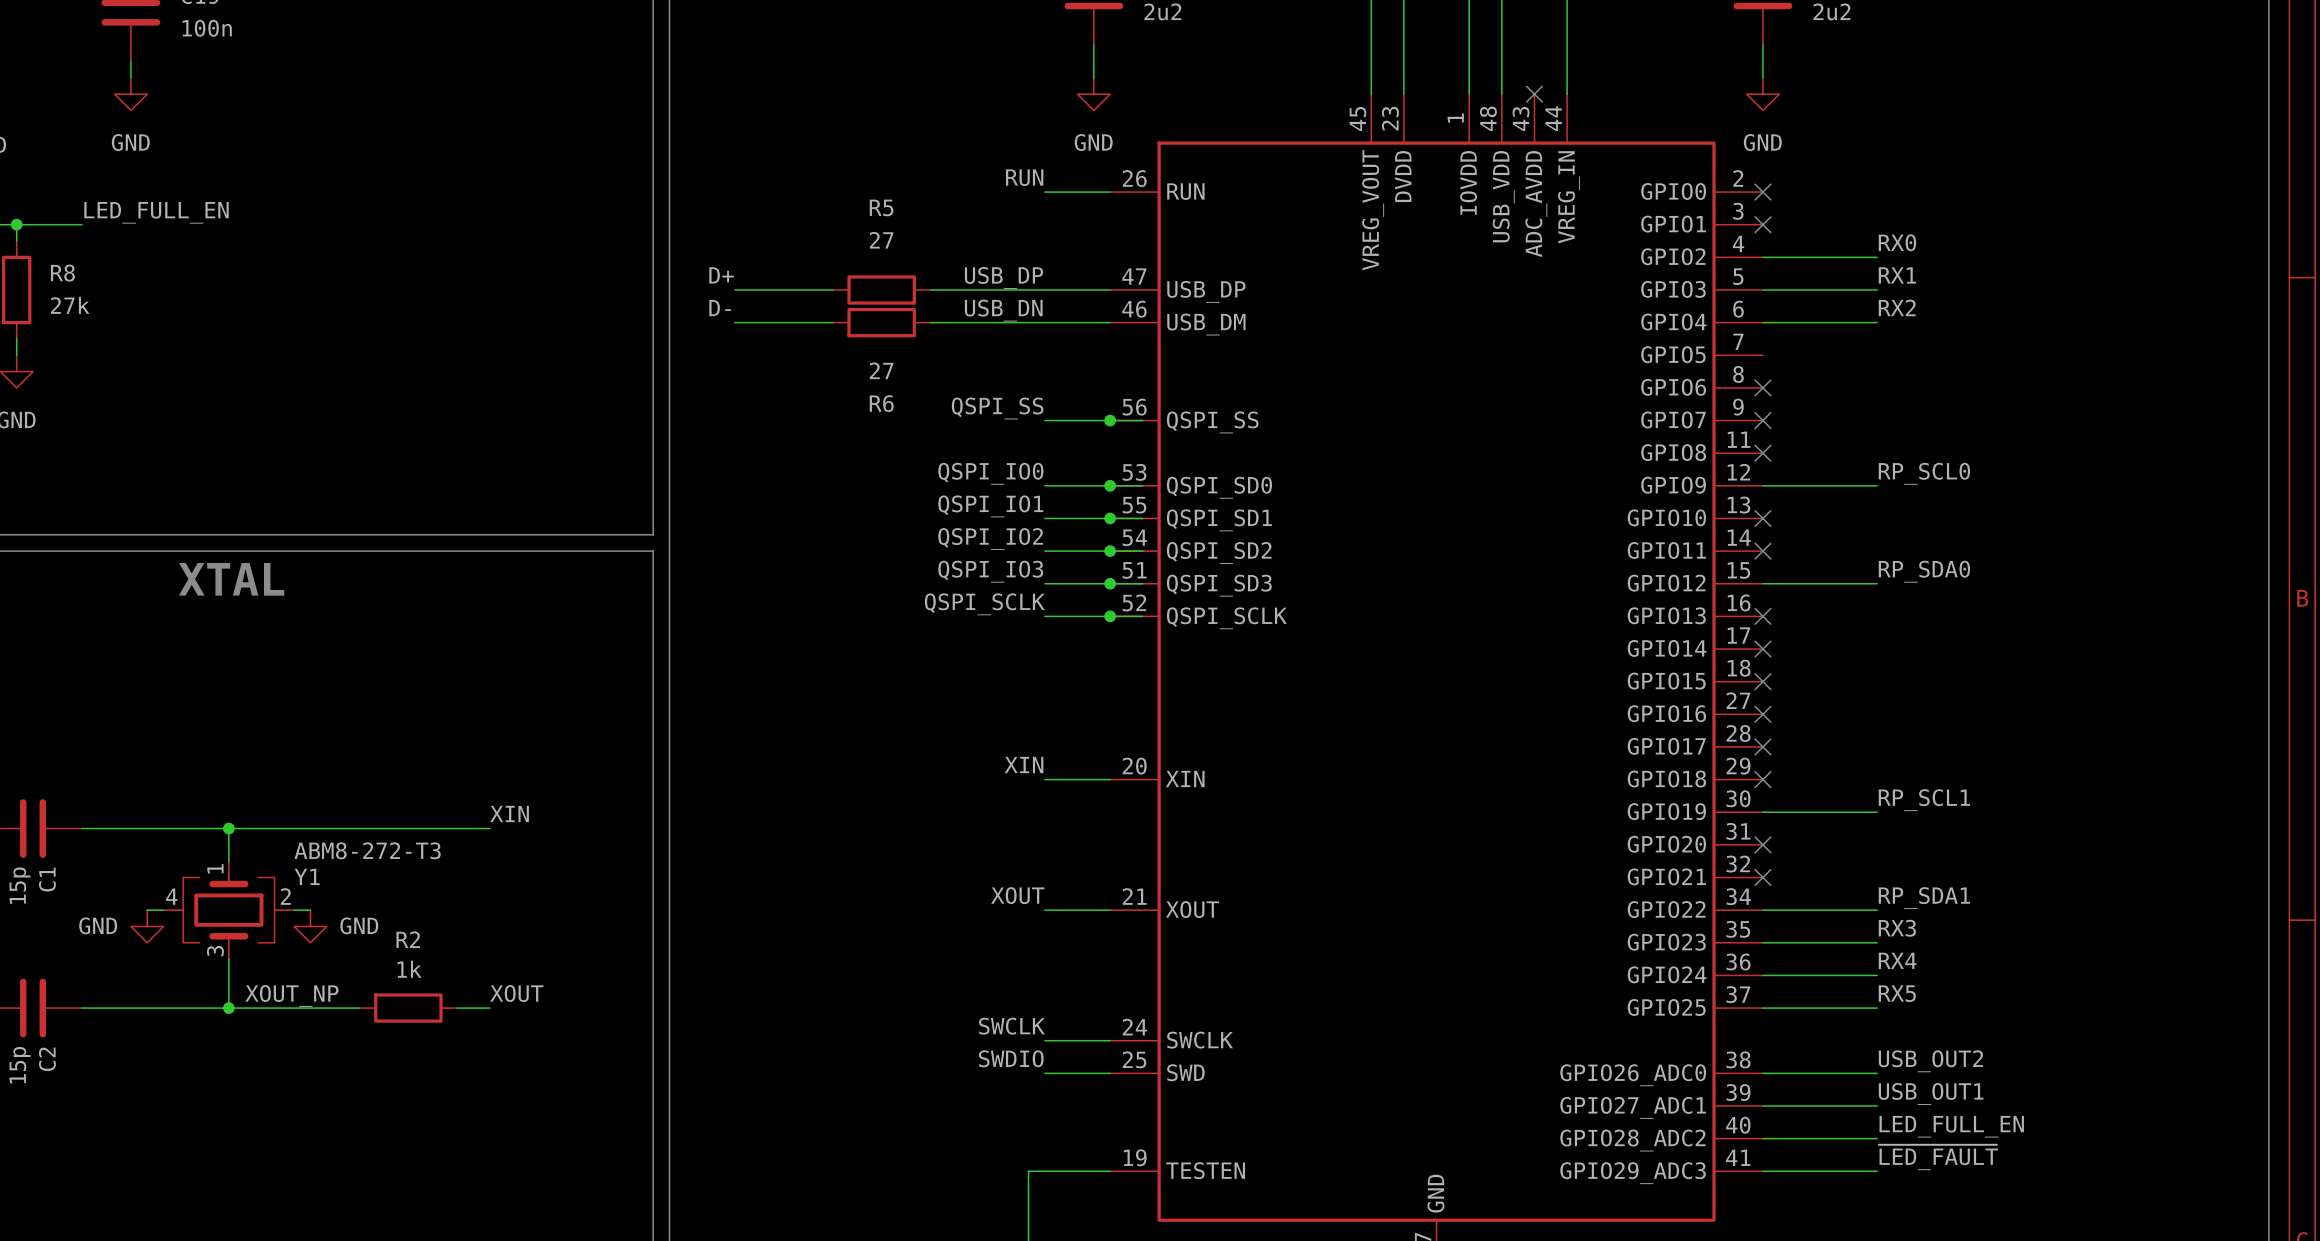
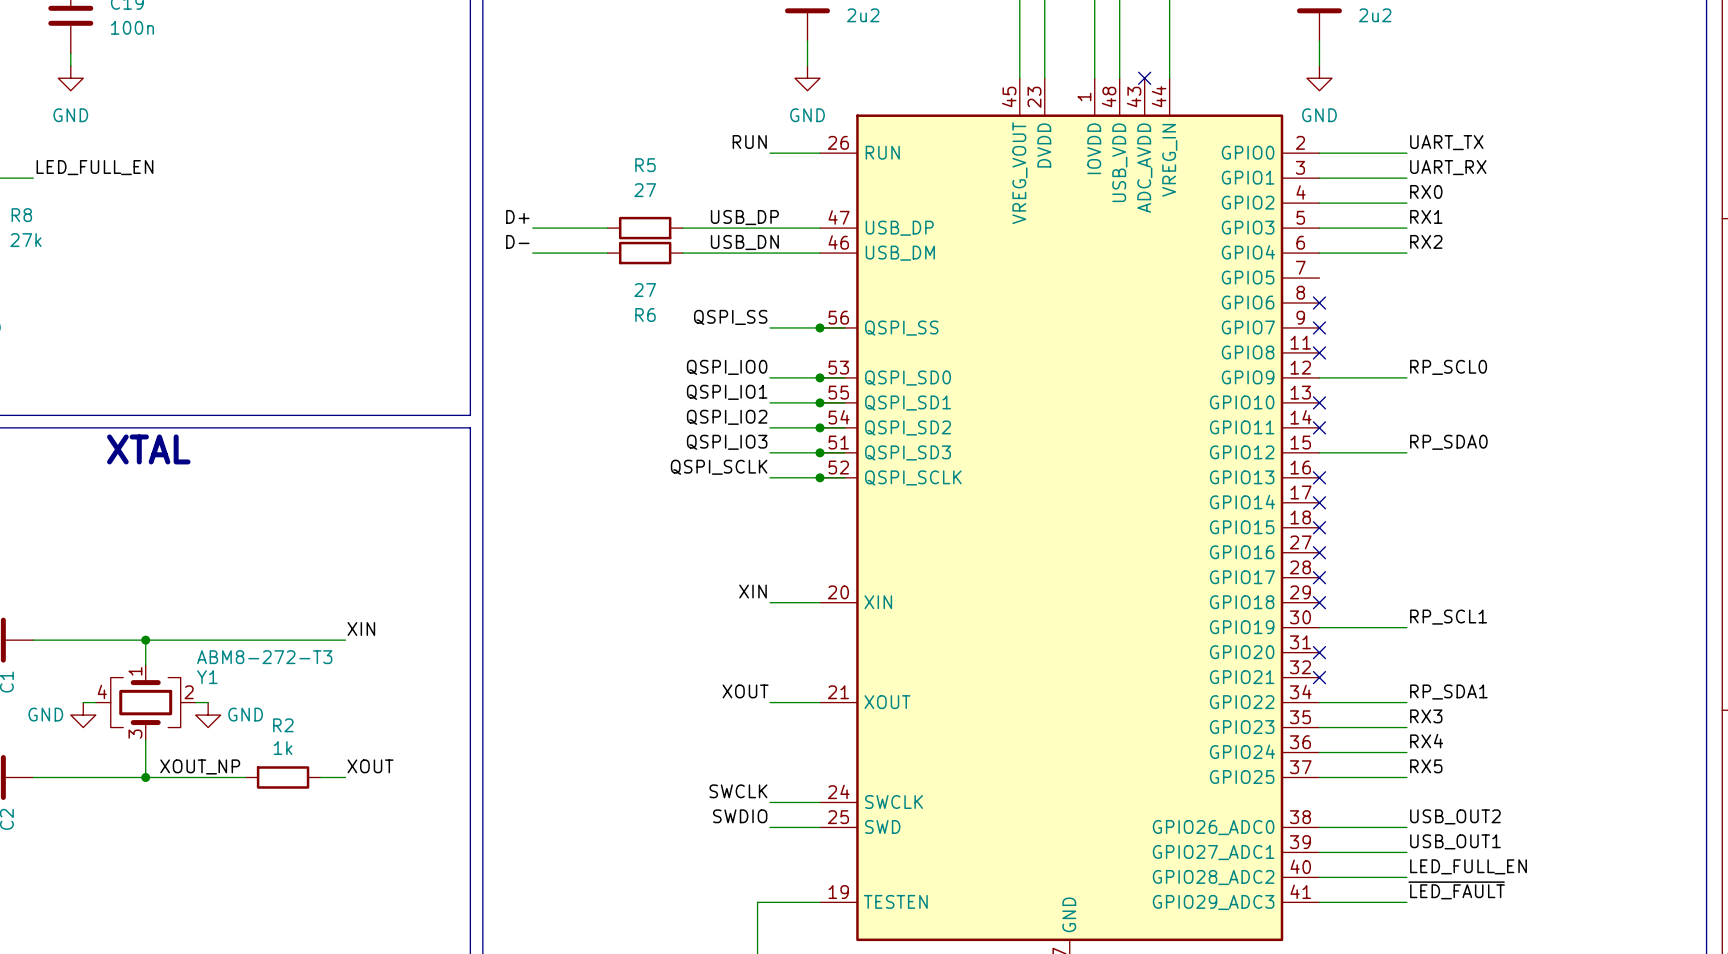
label: none -> UART_TX (1446, 142)
wire: none -> (1319, 153) (1406, 153)
no-connect mark: (1762, 192) -> none
label: none -> UART_RX (1448, 167)
wire: none -> (1319, 178) (1406, 178)
no-connect mark: (1762, 224) -> none

